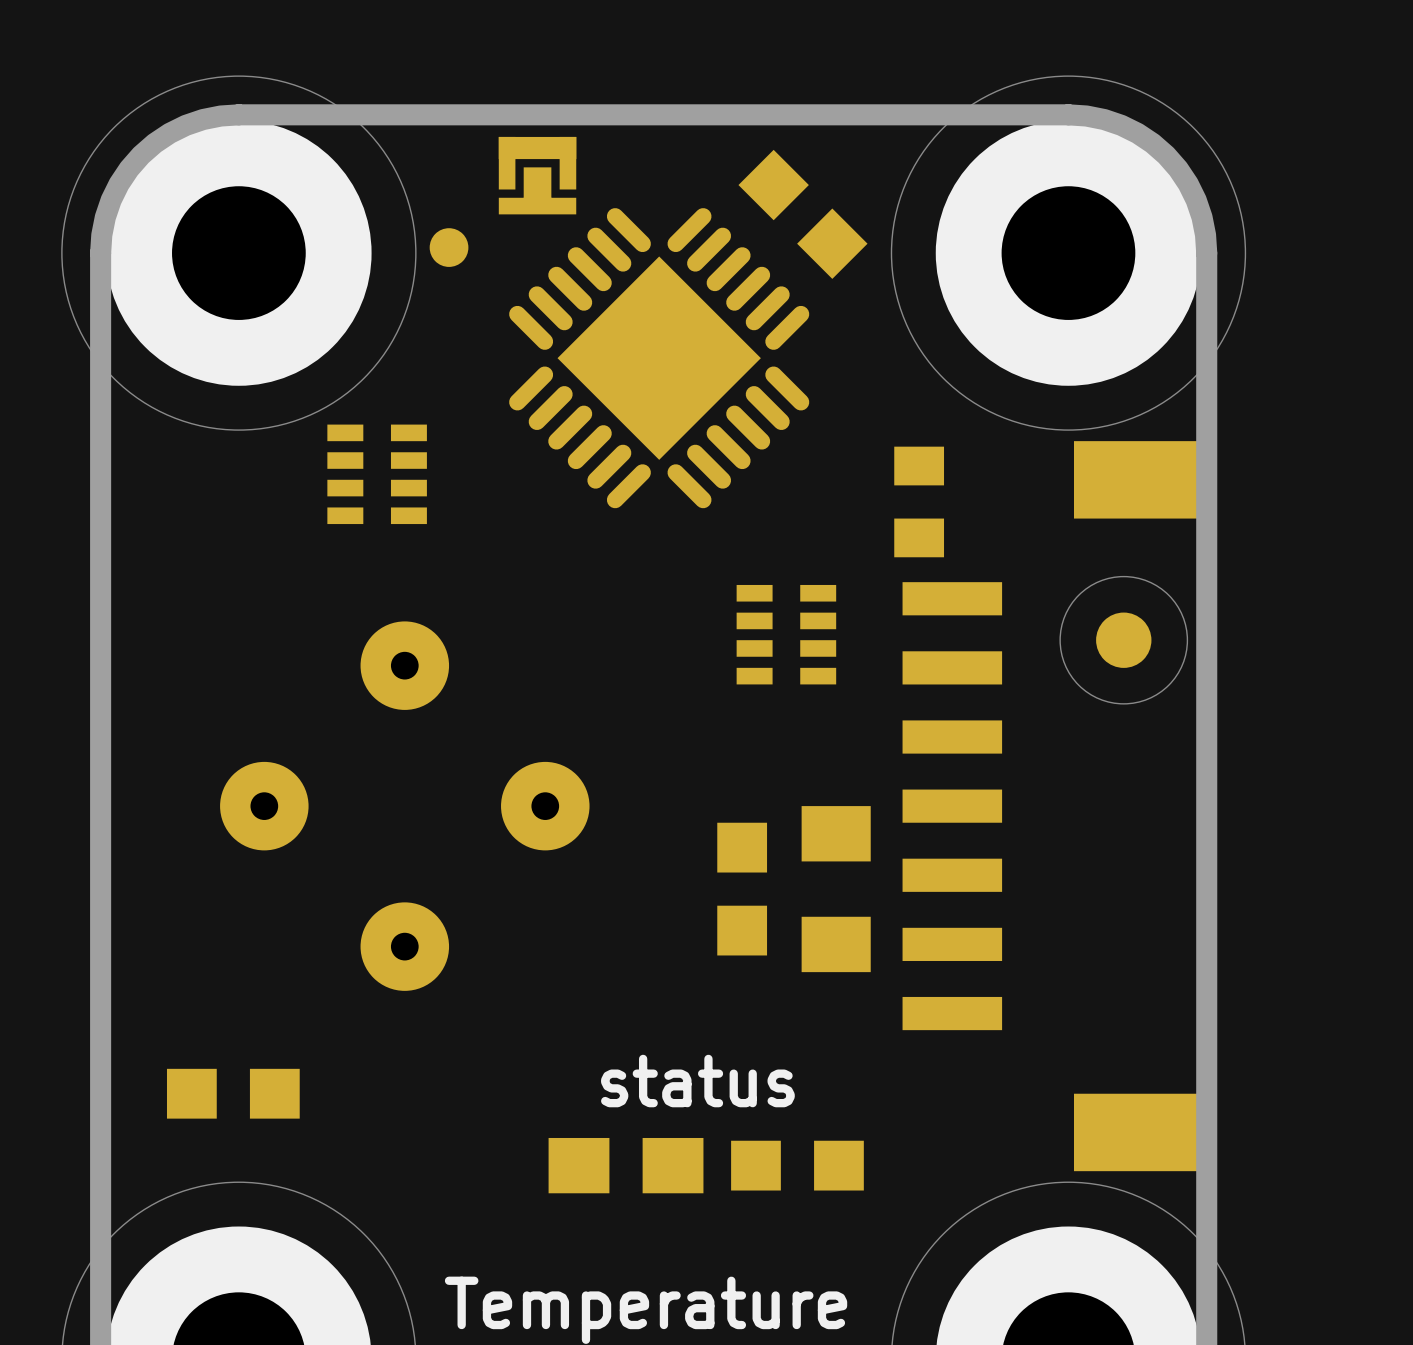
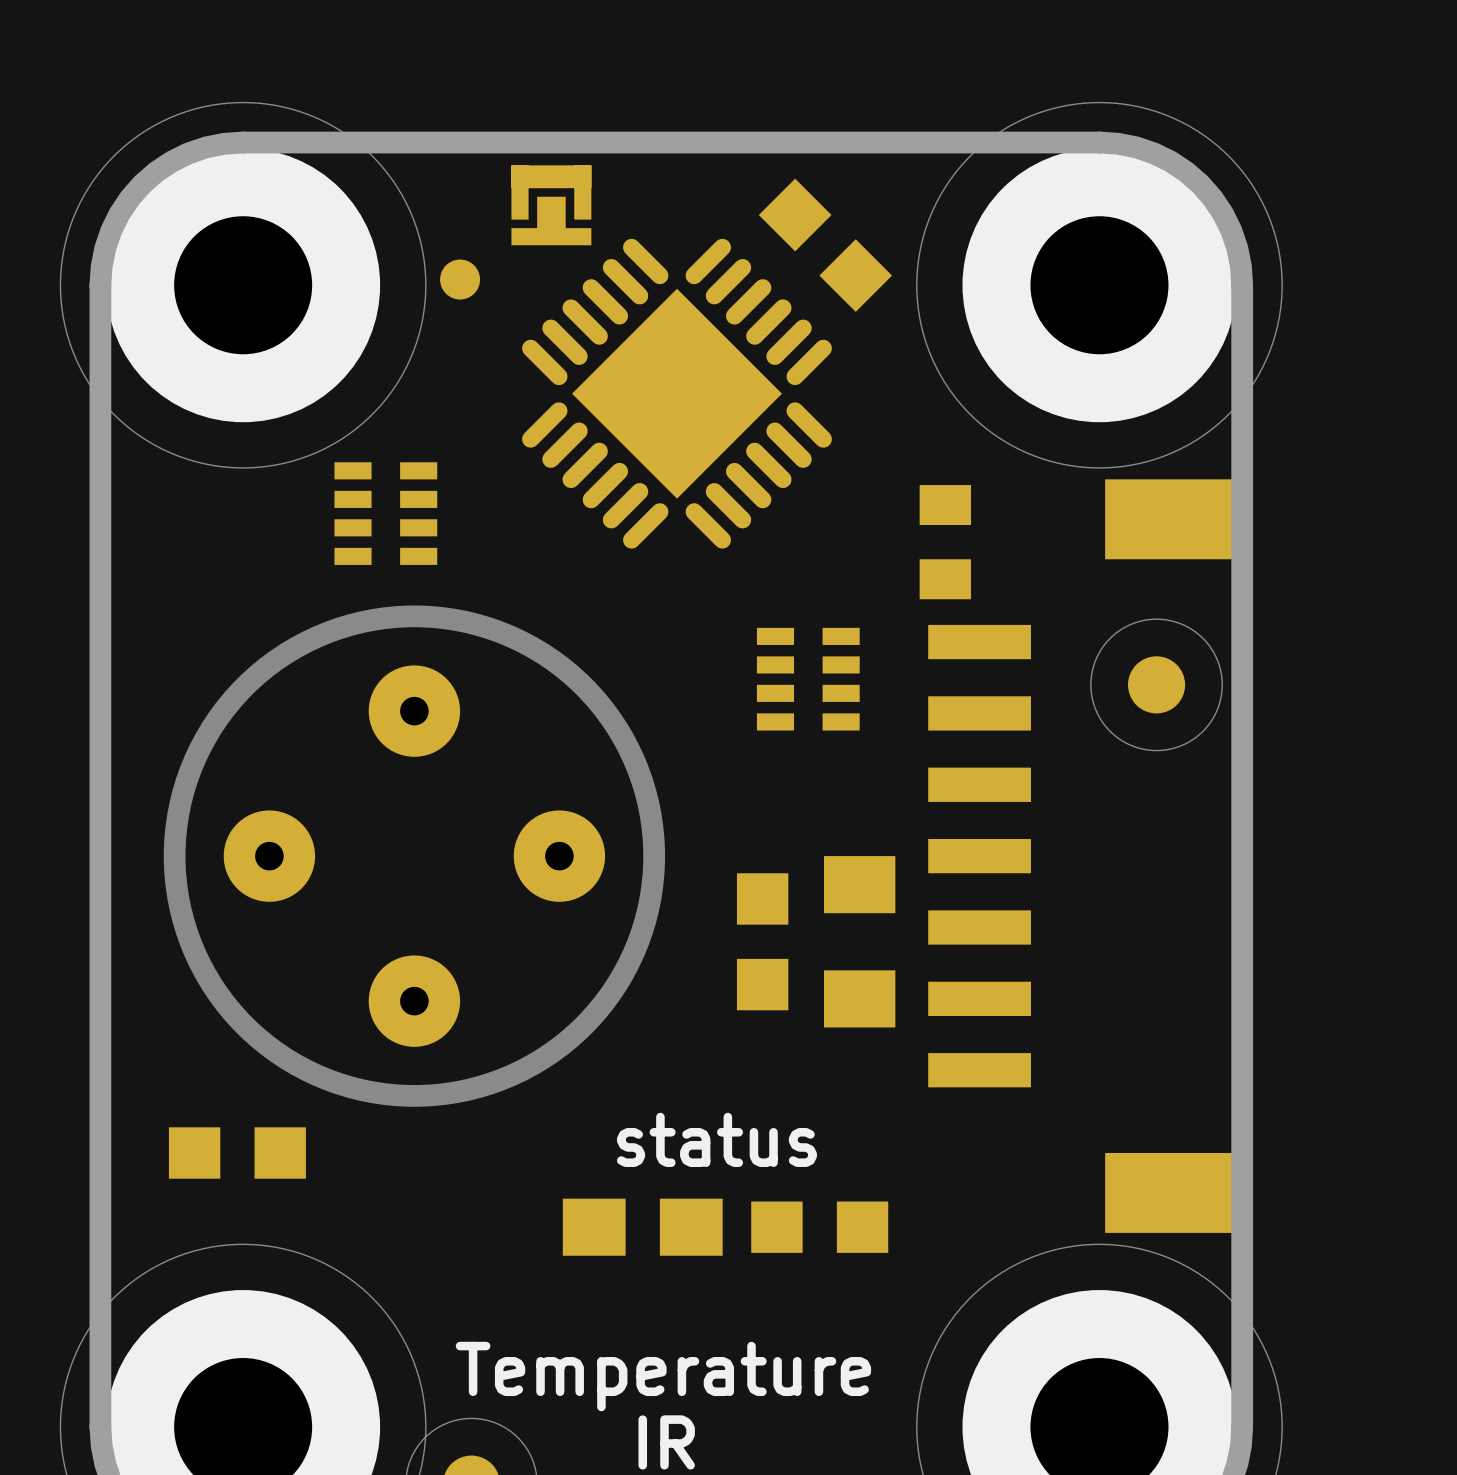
drawing: none -> [163, 605, 666, 1107]

